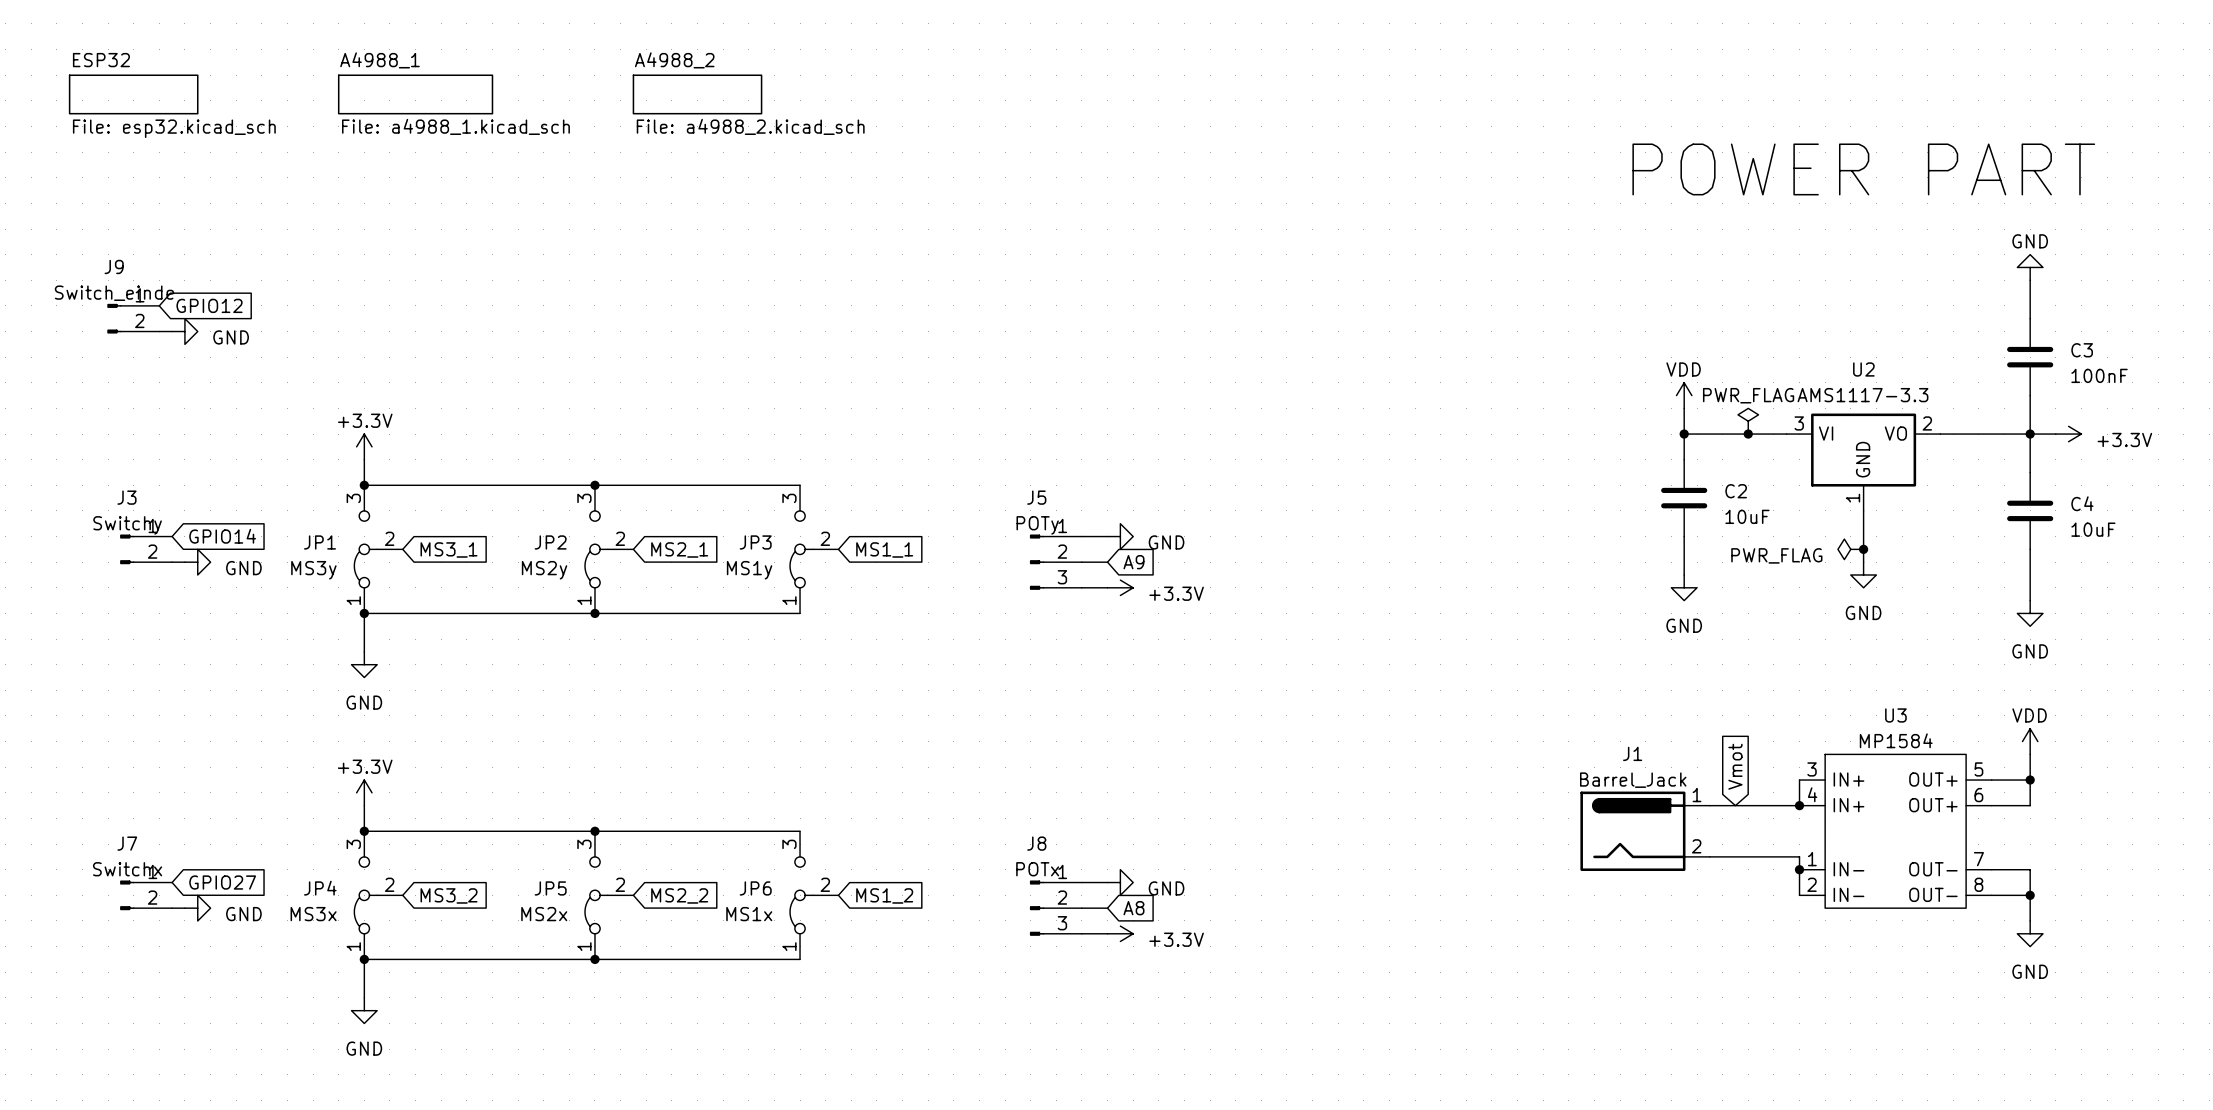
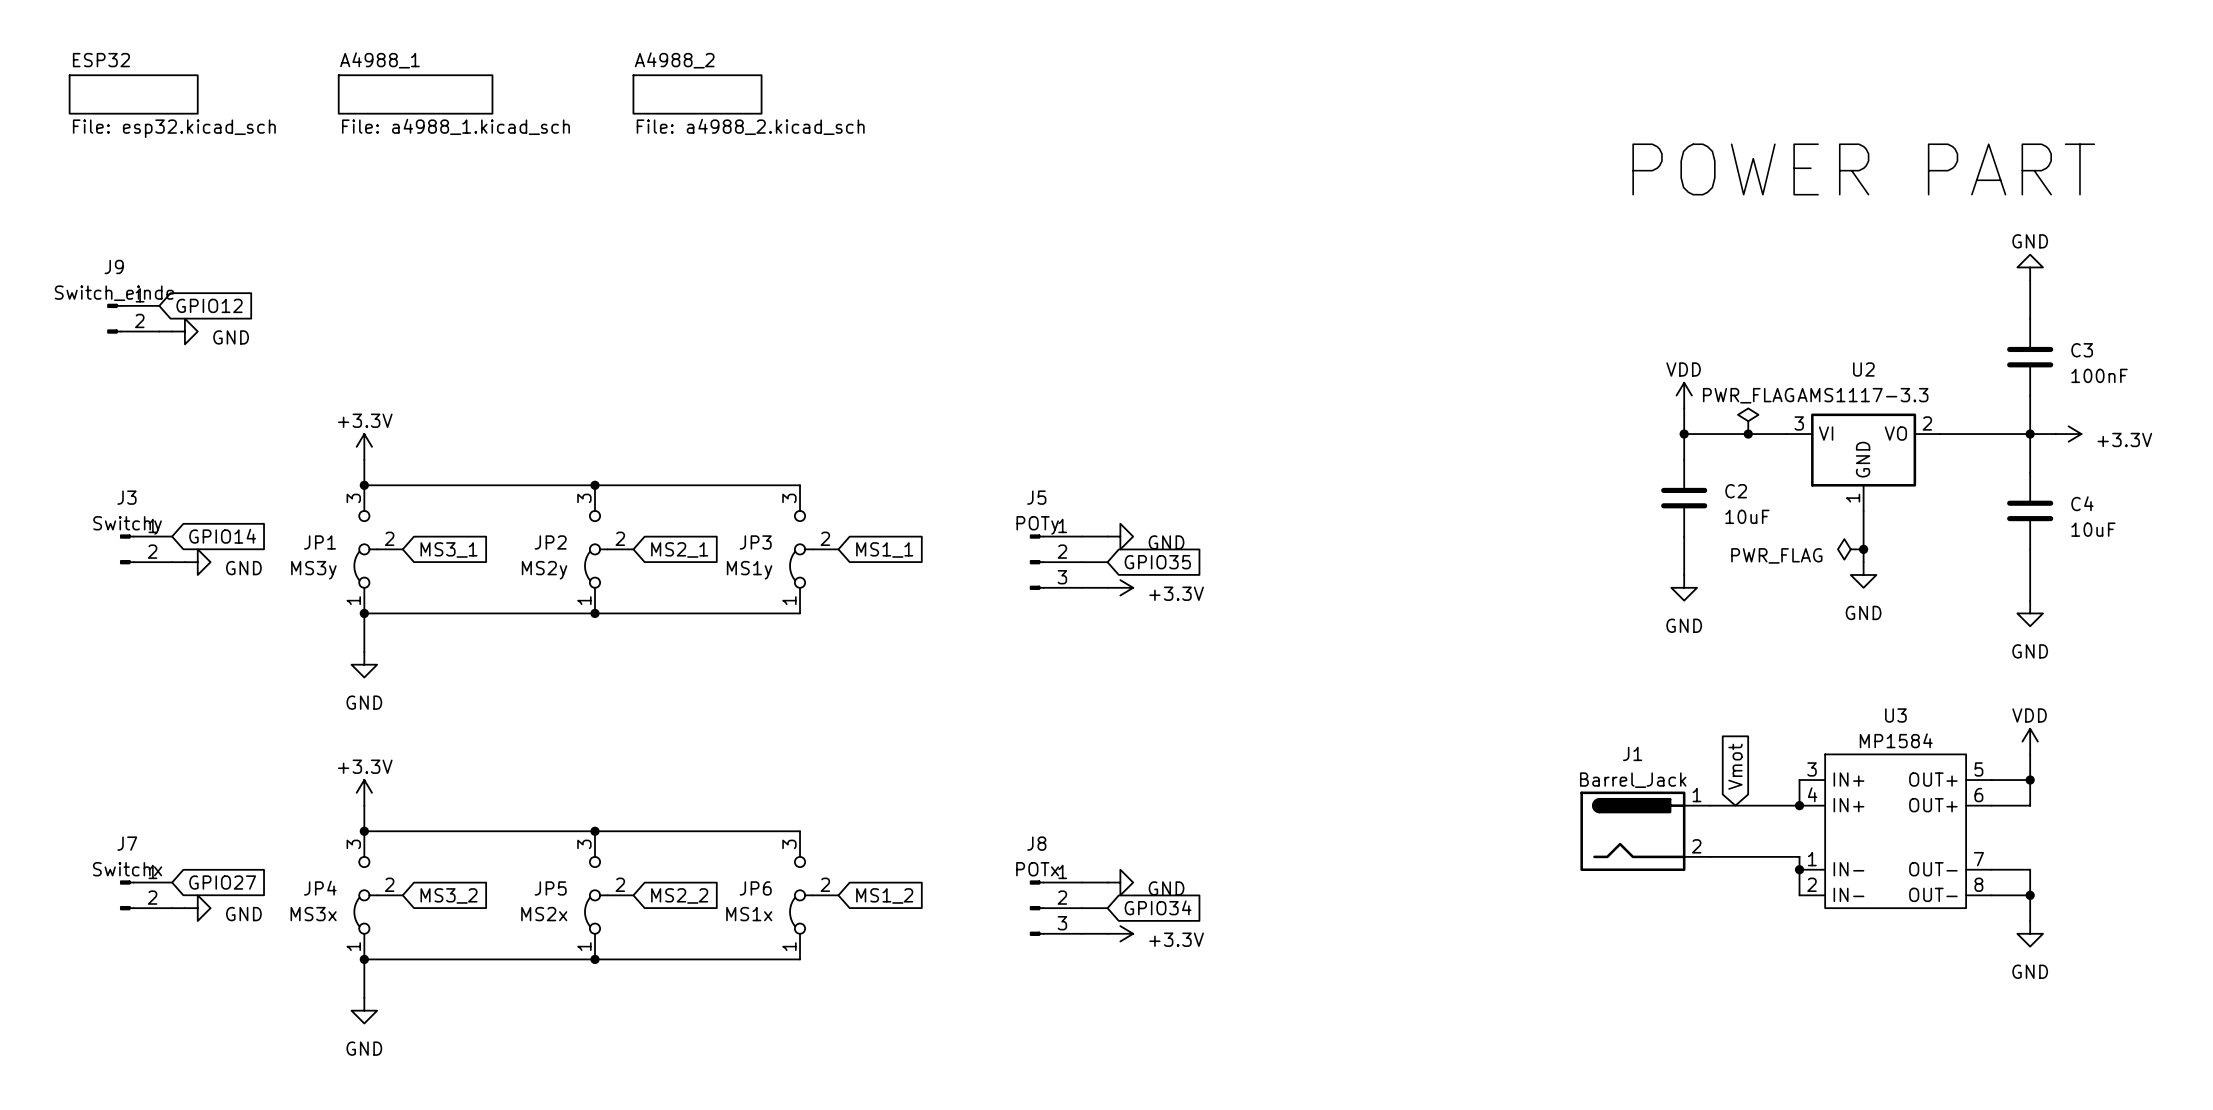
global label: A9 (1133, 562) -> GPIO35 (1157, 562)
global label: A8 (1133, 908) -> GPIO34 (1158, 907)

